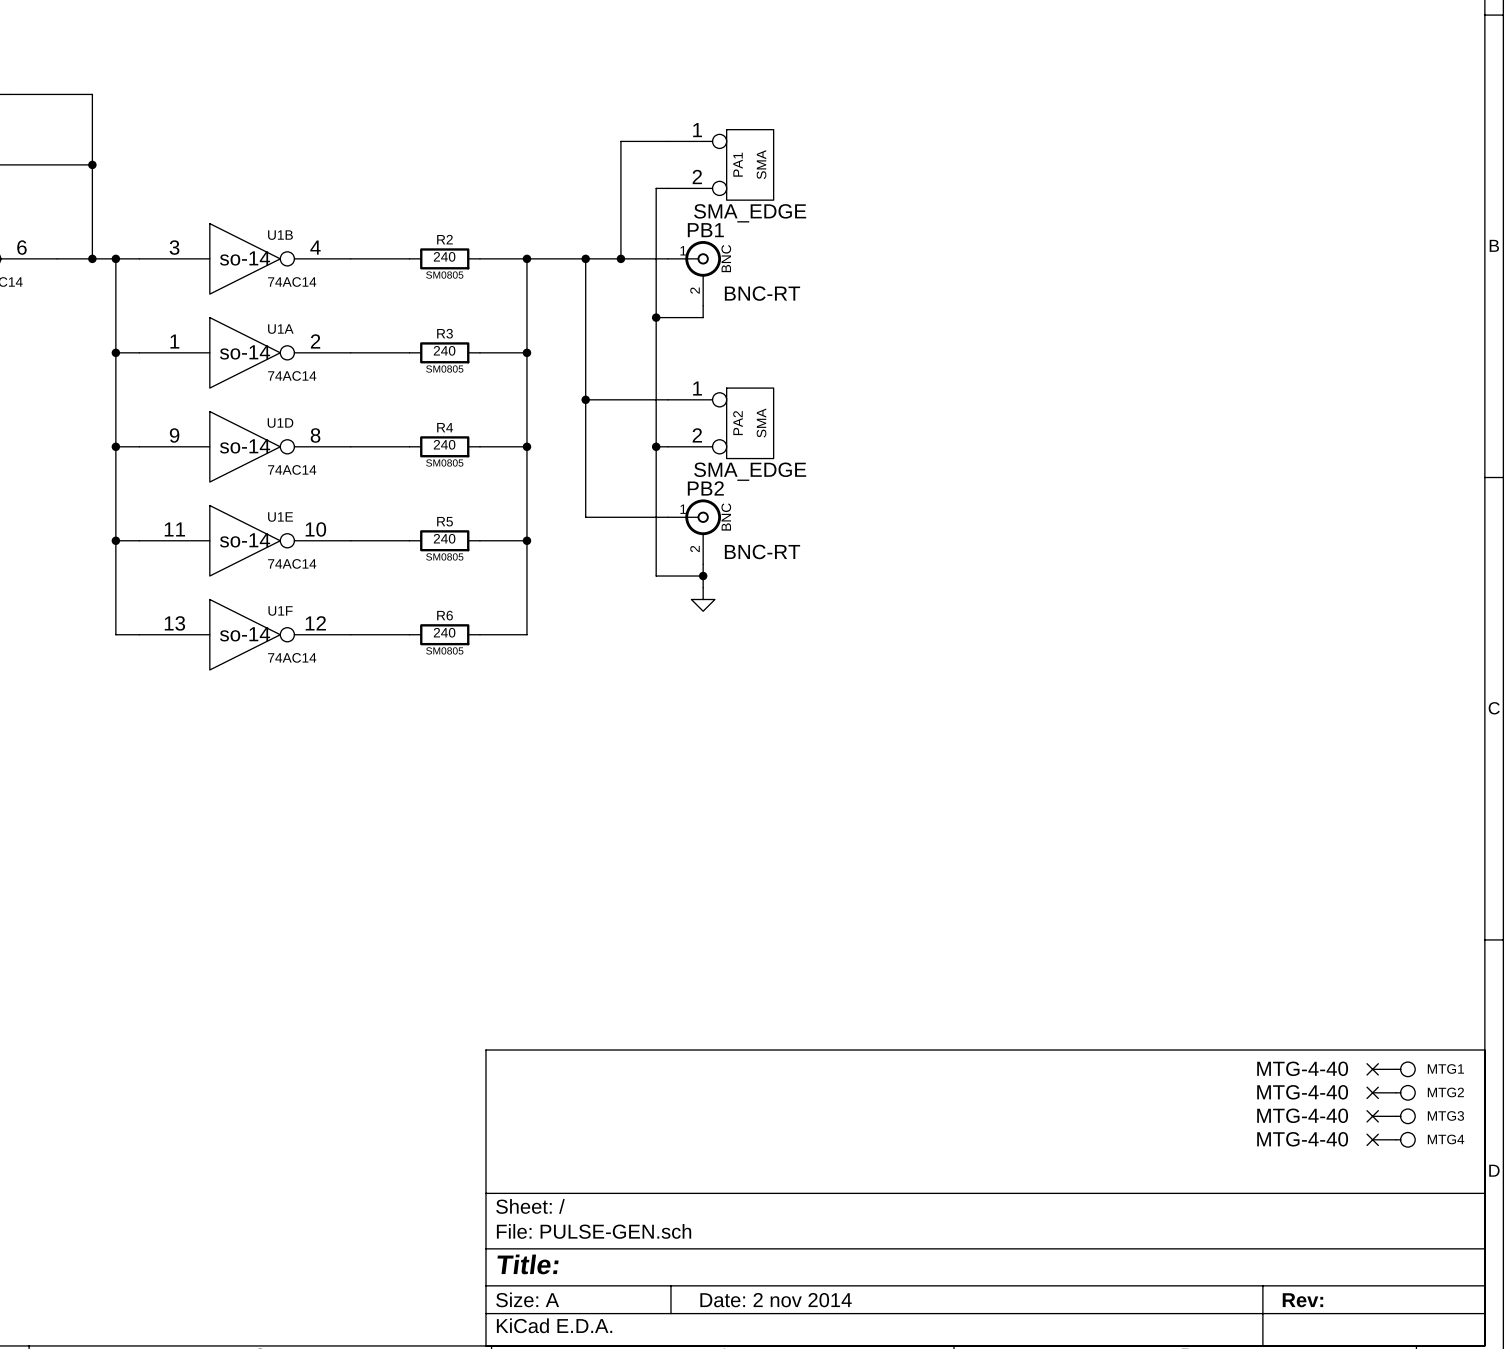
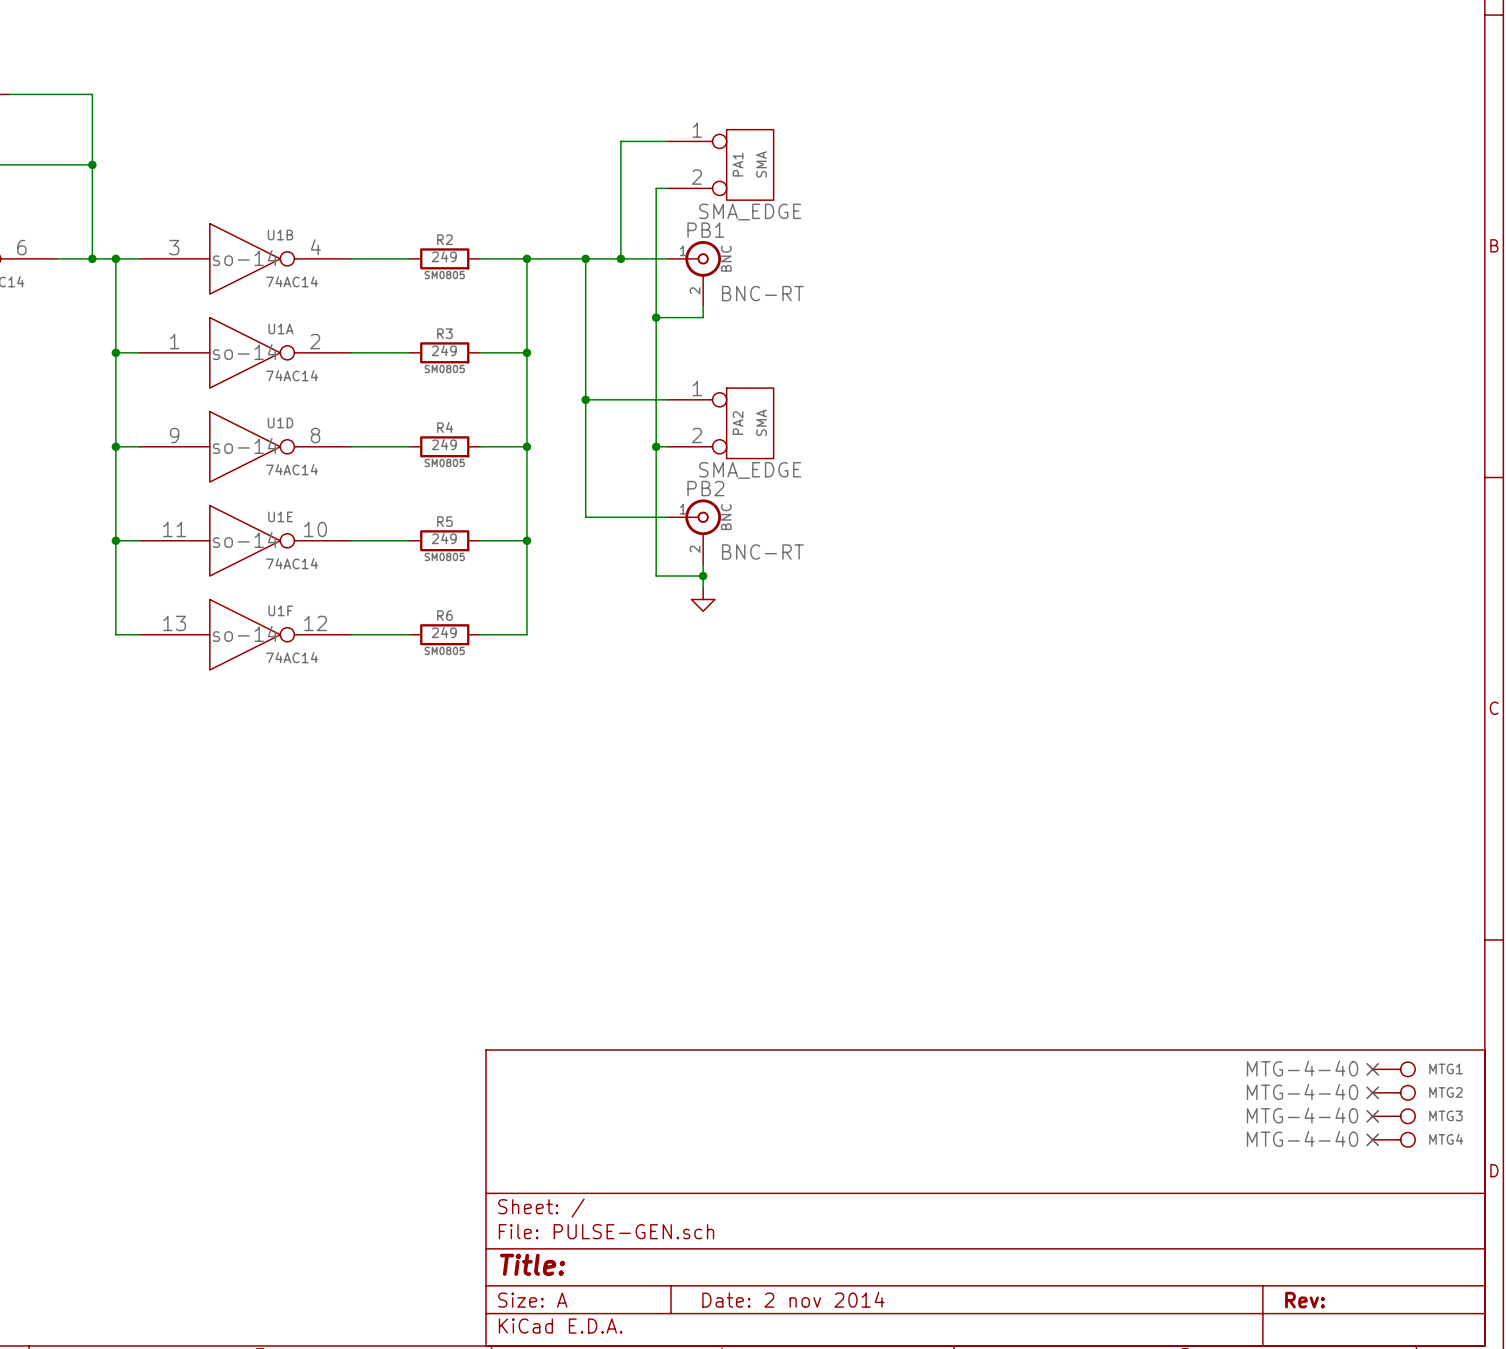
R2 value: 240 (444, 256) -> 249 (444, 256)
R3 value: 240 (444, 350) -> 249 (444, 350)
R4 value: 240 (444, 444) -> 249 (444, 444)
R5 value: 240 (444, 538) -> 249 (444, 538)
R6 value: 240 (444, 632) -> 249 (444, 632)

